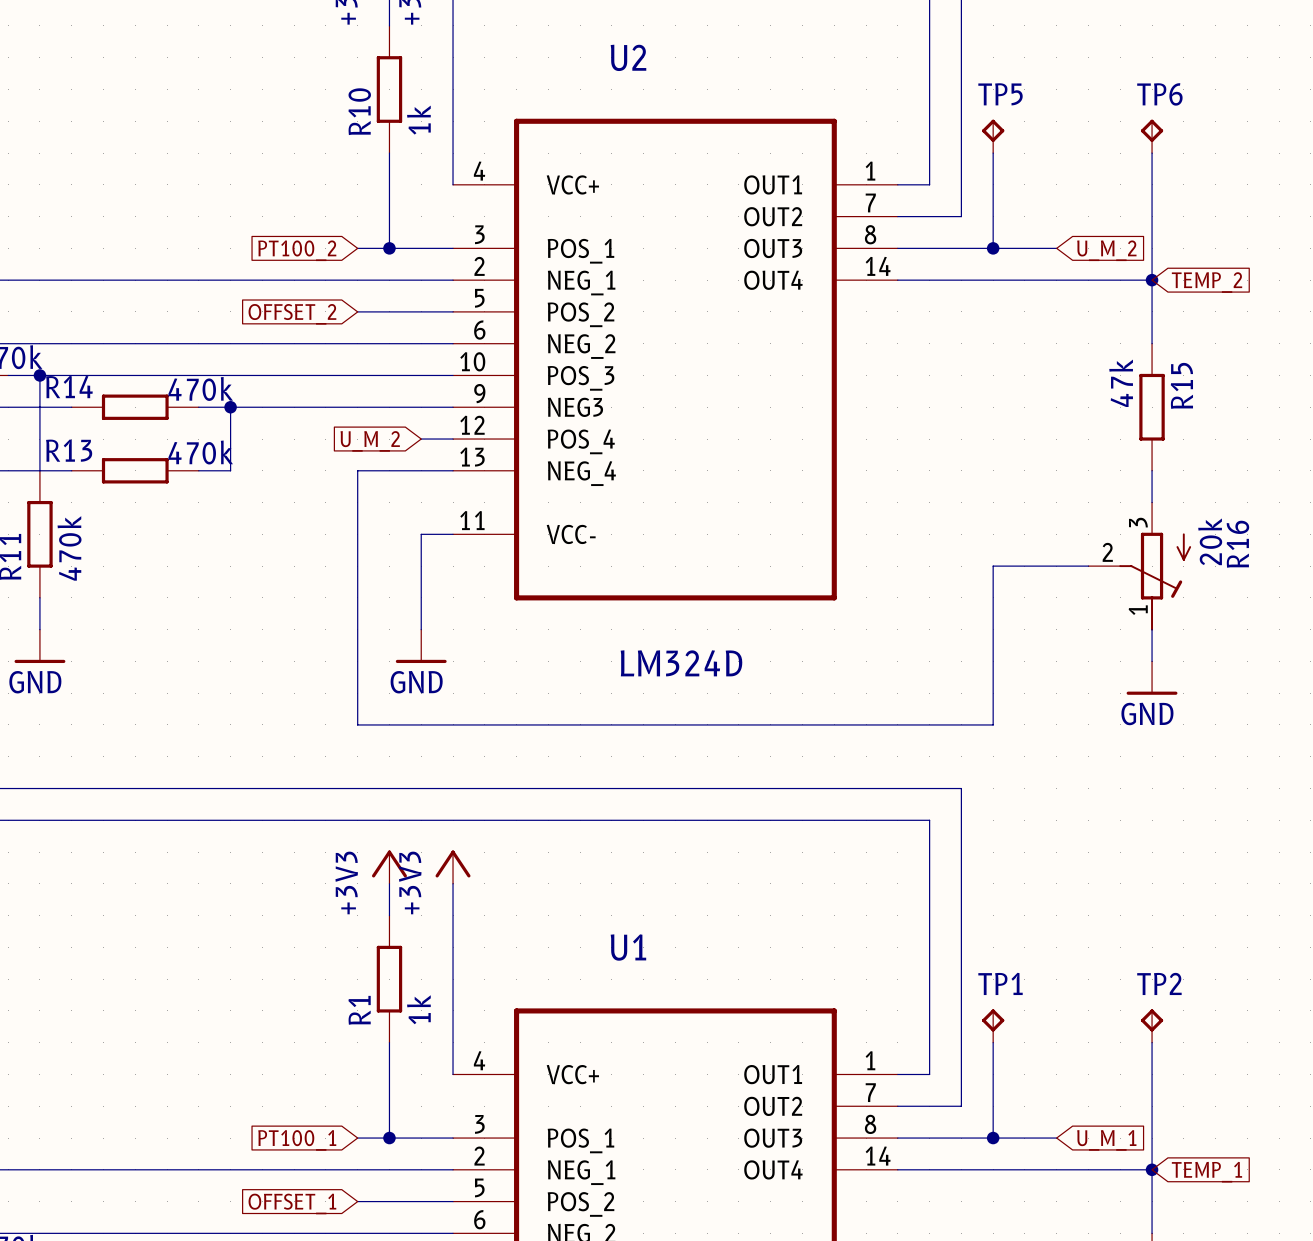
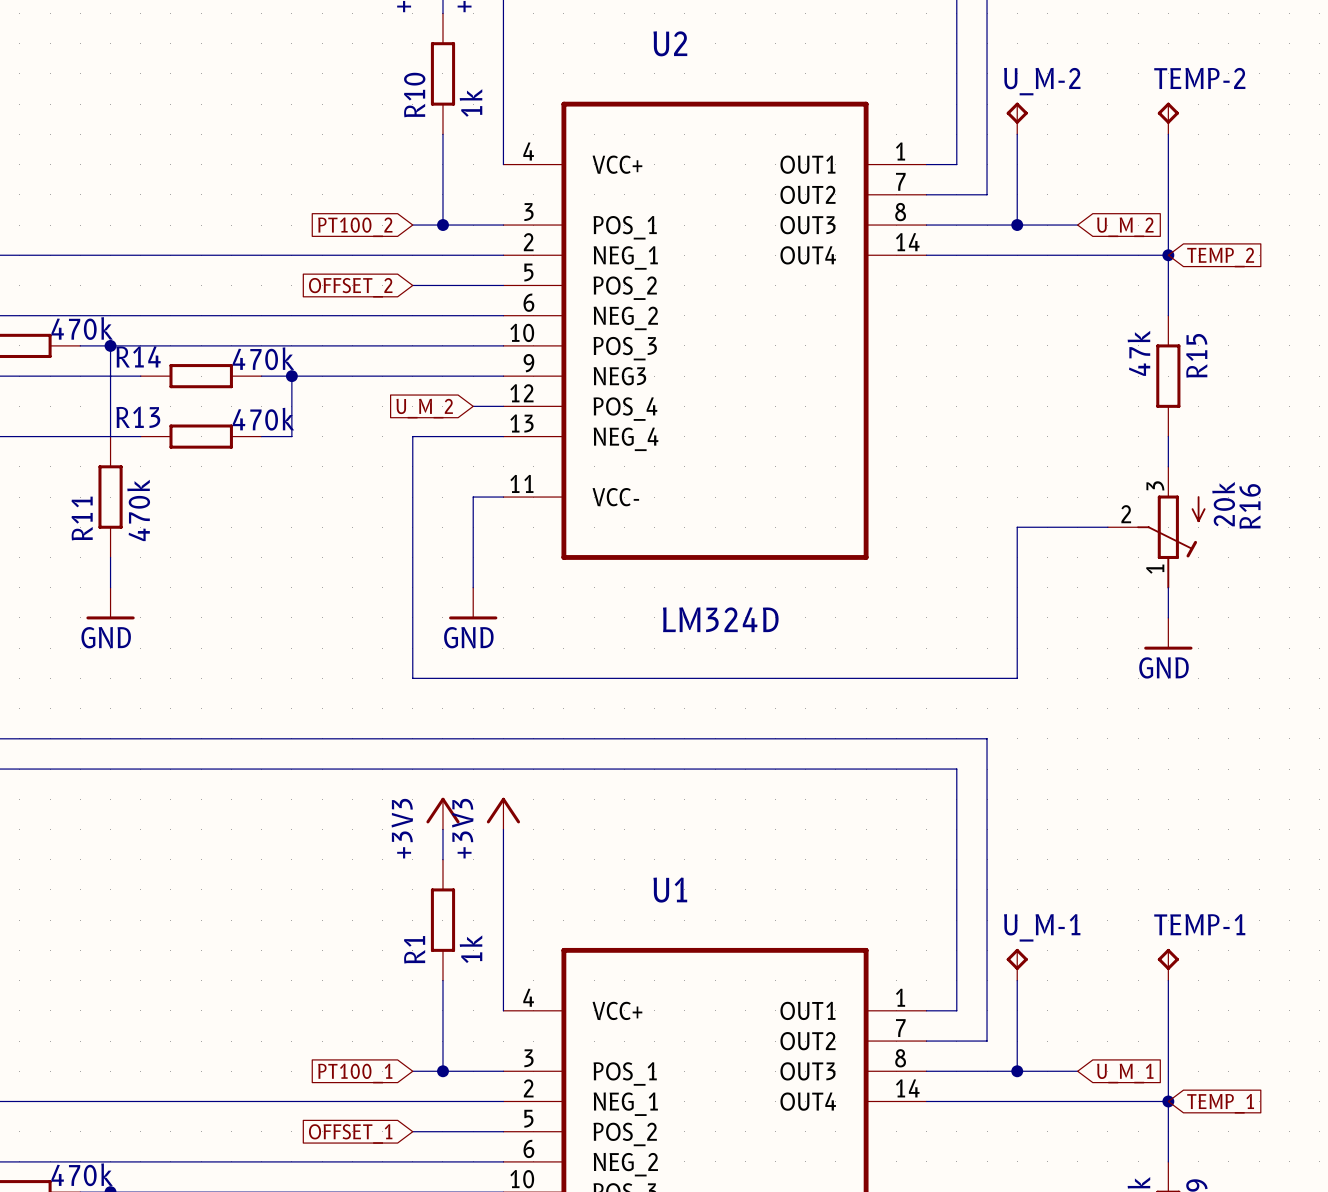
TP5 name: TP5 (1000, 94) -> U_M-2 (1042, 81)
TP6 name: TP6 (1159, 94) -> TEMP-2 (1199, 78)
TP1 name: TP1 (1000, 983) -> U_M-1 (1042, 927)
TP2 name: TP2 (1159, 983) -> TEMP-1 (1199, 924)

